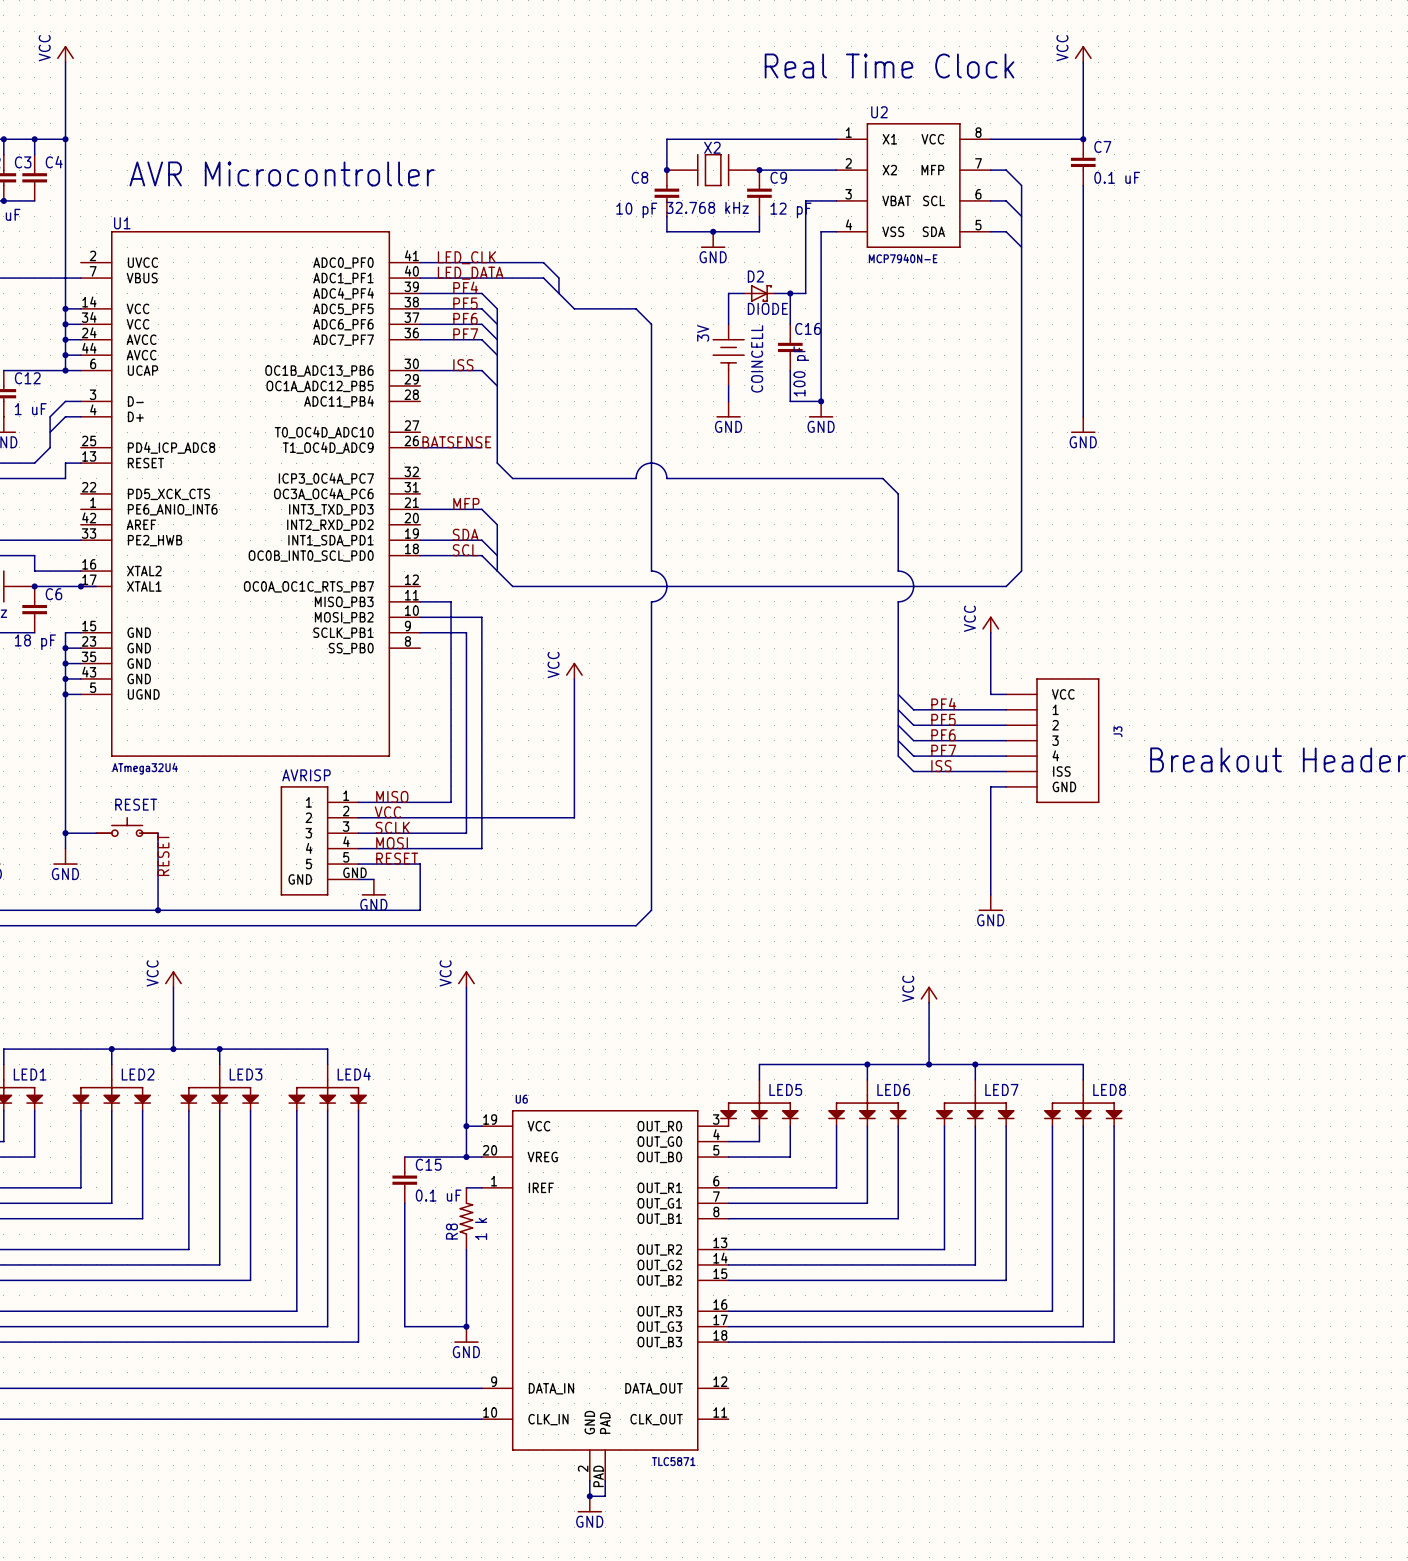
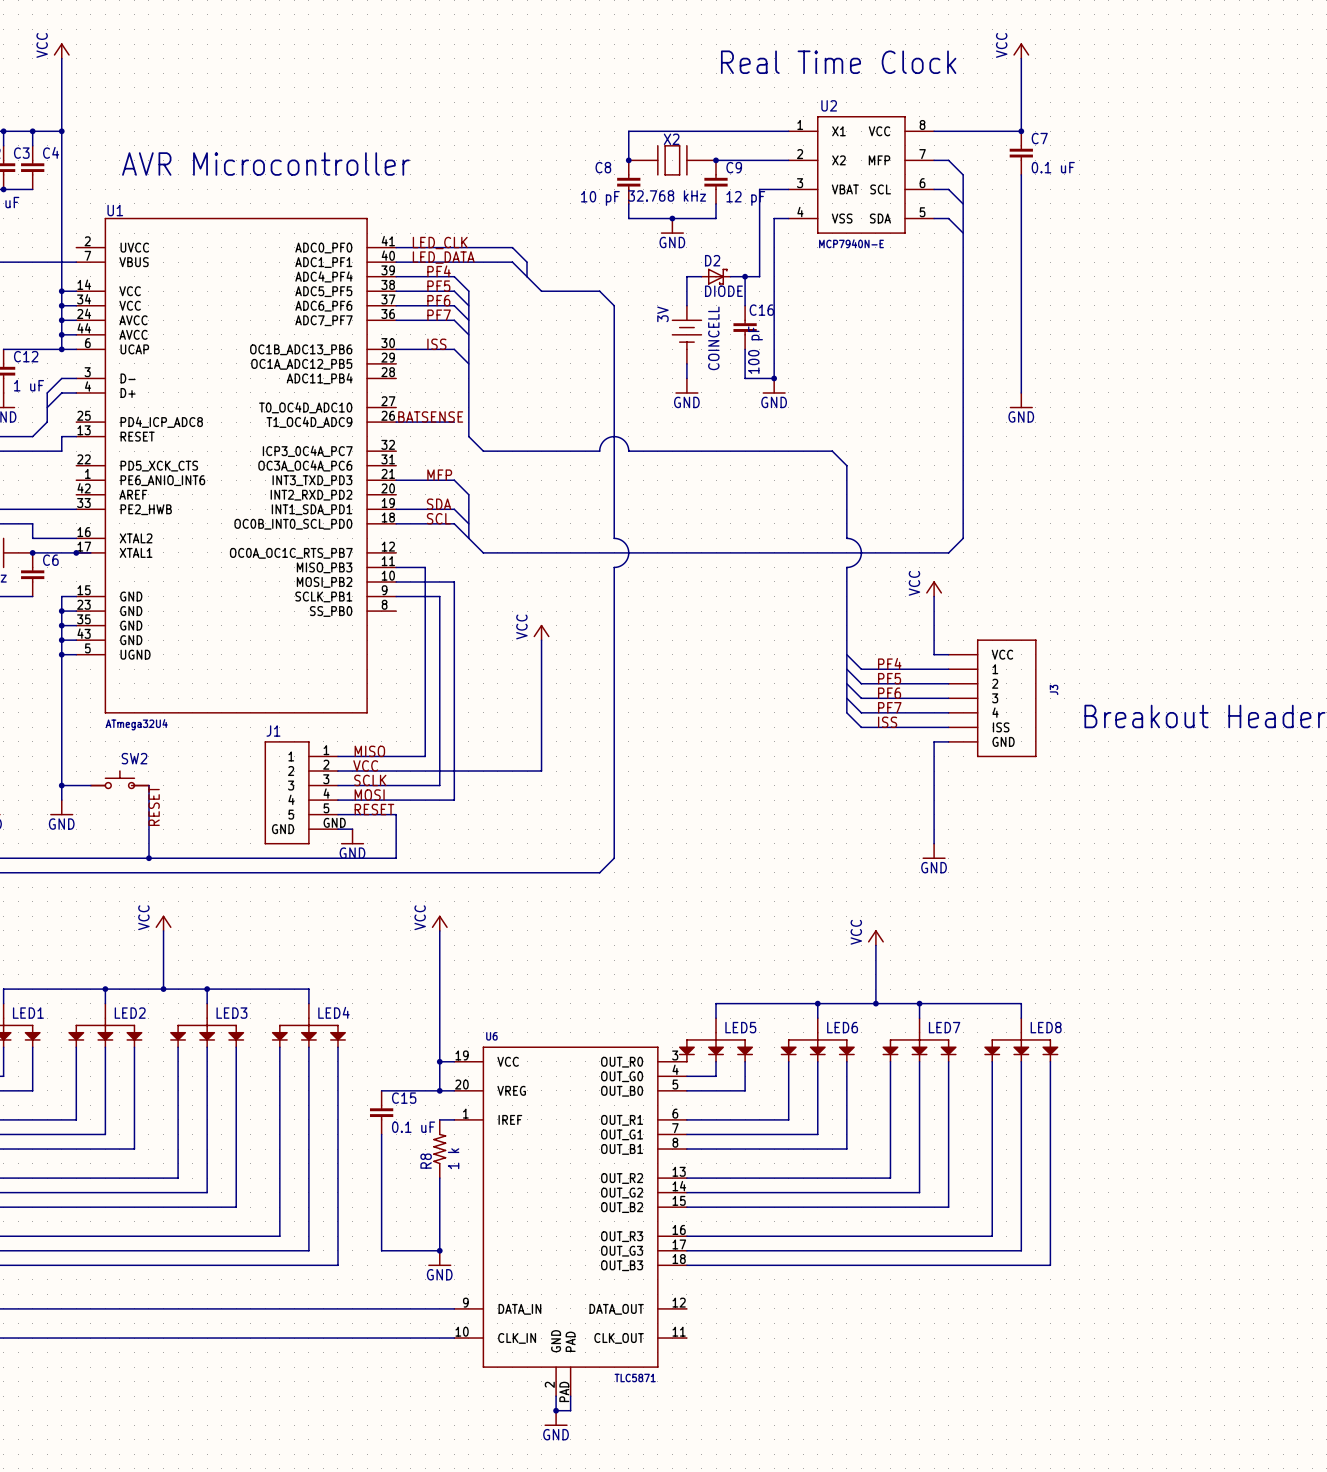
C6 value: 18 pF (35, 642) -> none
AVRISP name: AVRISP (306, 775) -> J1 (273, 731)
RESET name: RESET (136, 804) -> SW2 (134, 758)

